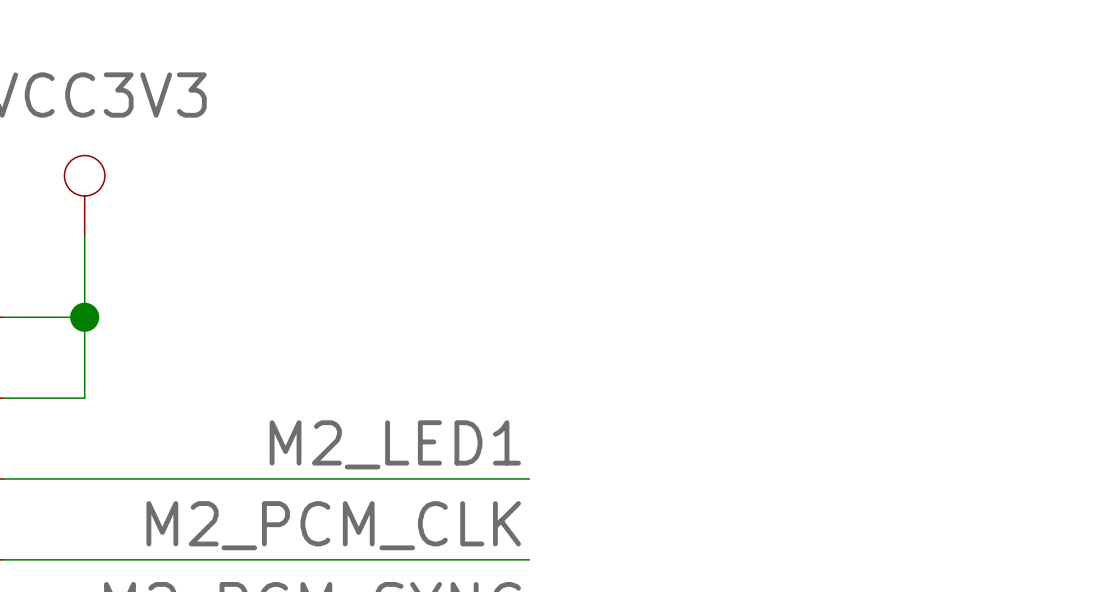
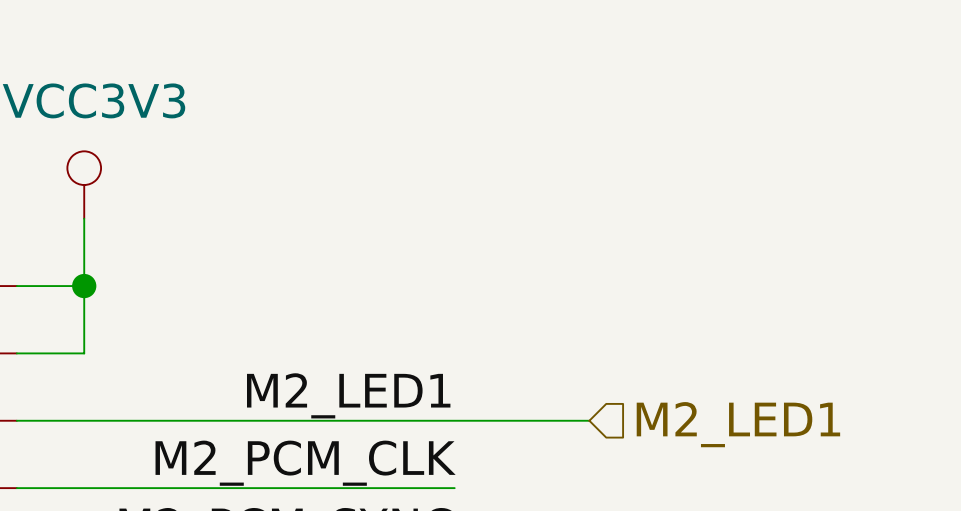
wire: none -> (454, 420) (589, 420)
hierarchical label: none -> M2_LED1 (738, 424)

